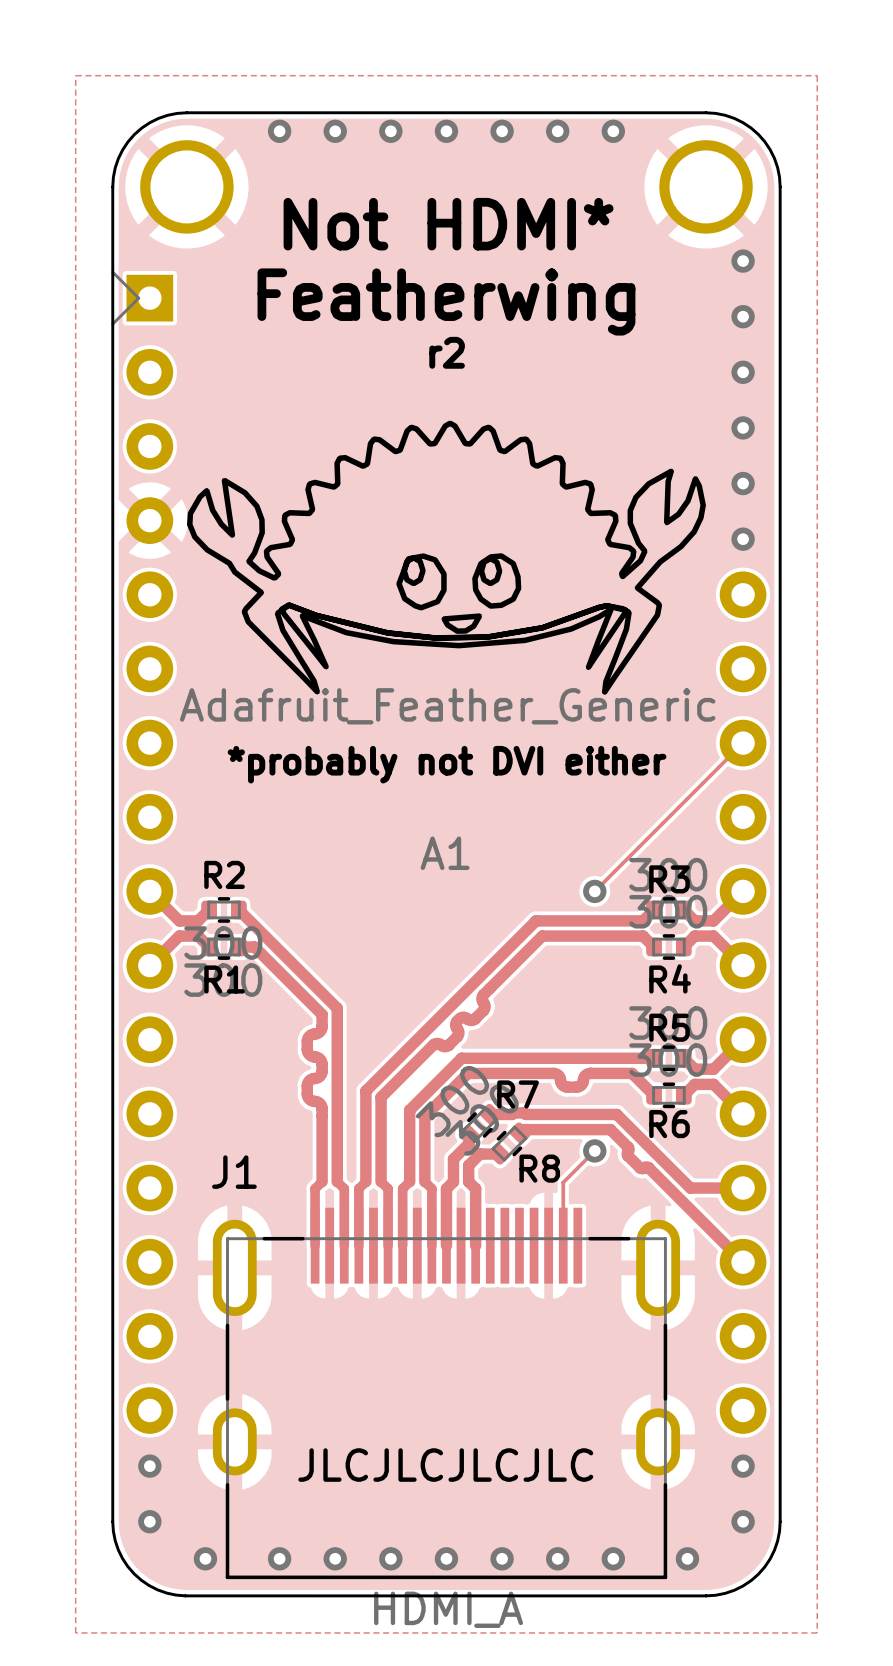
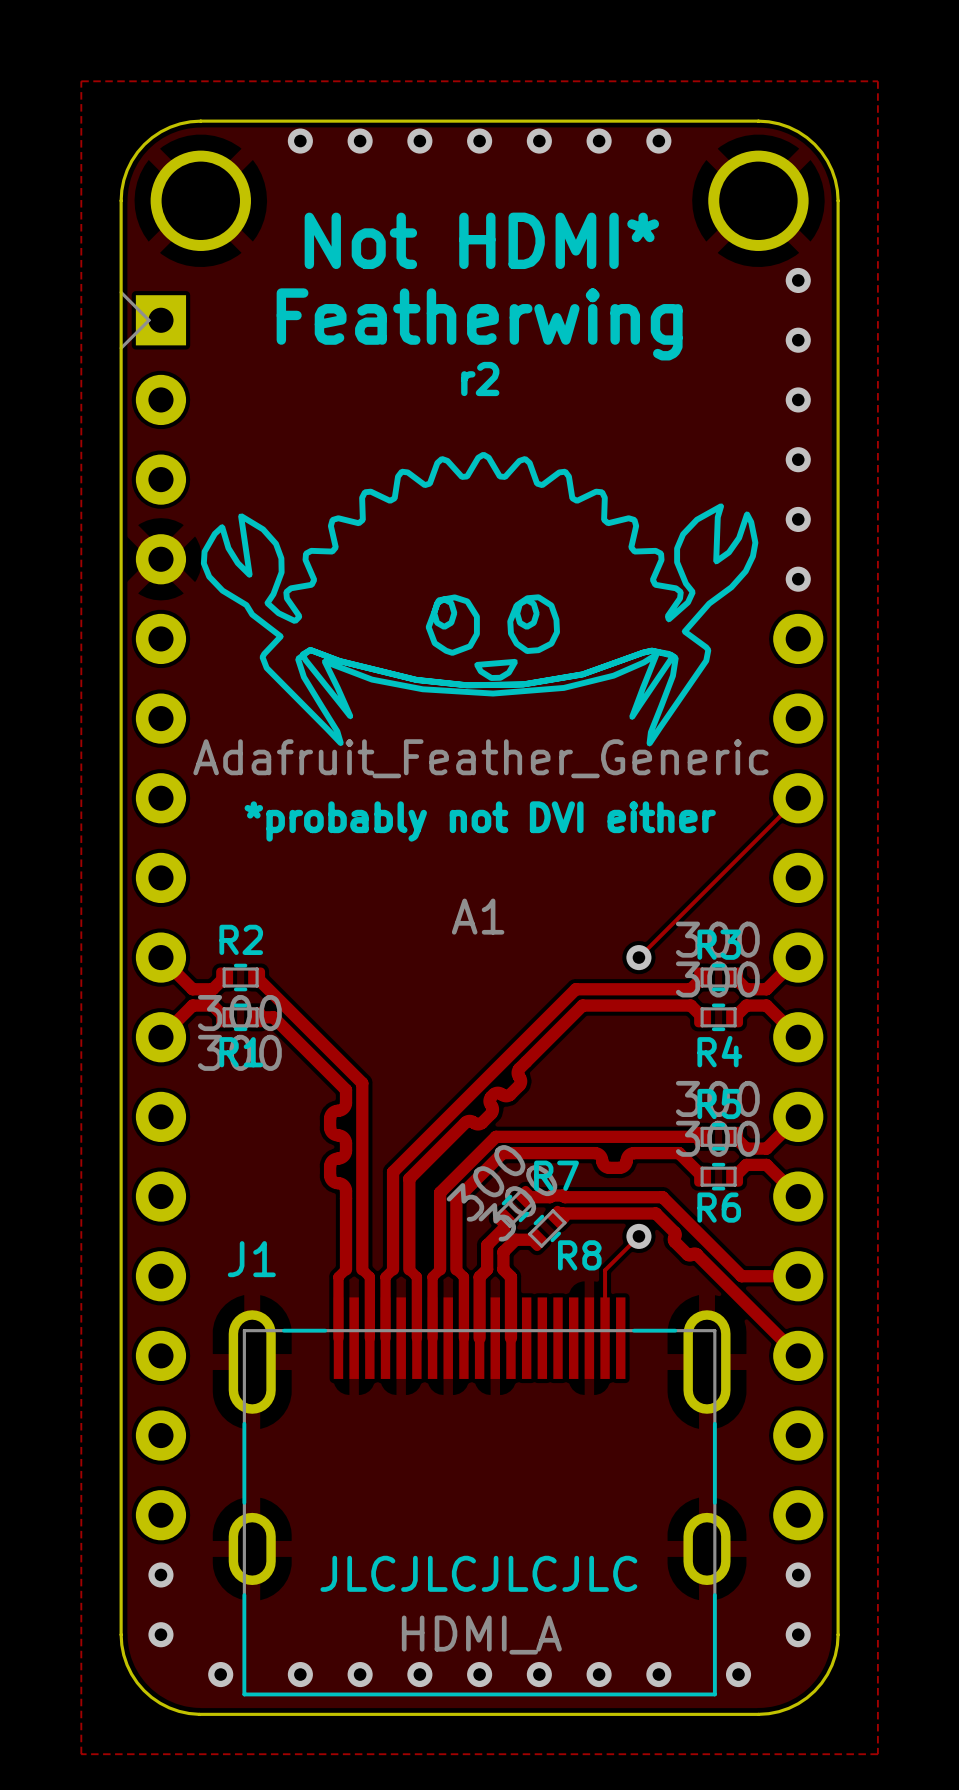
J1 value position: HDMI_A (448, 1609) -> HDMI_A (481, 1635)

